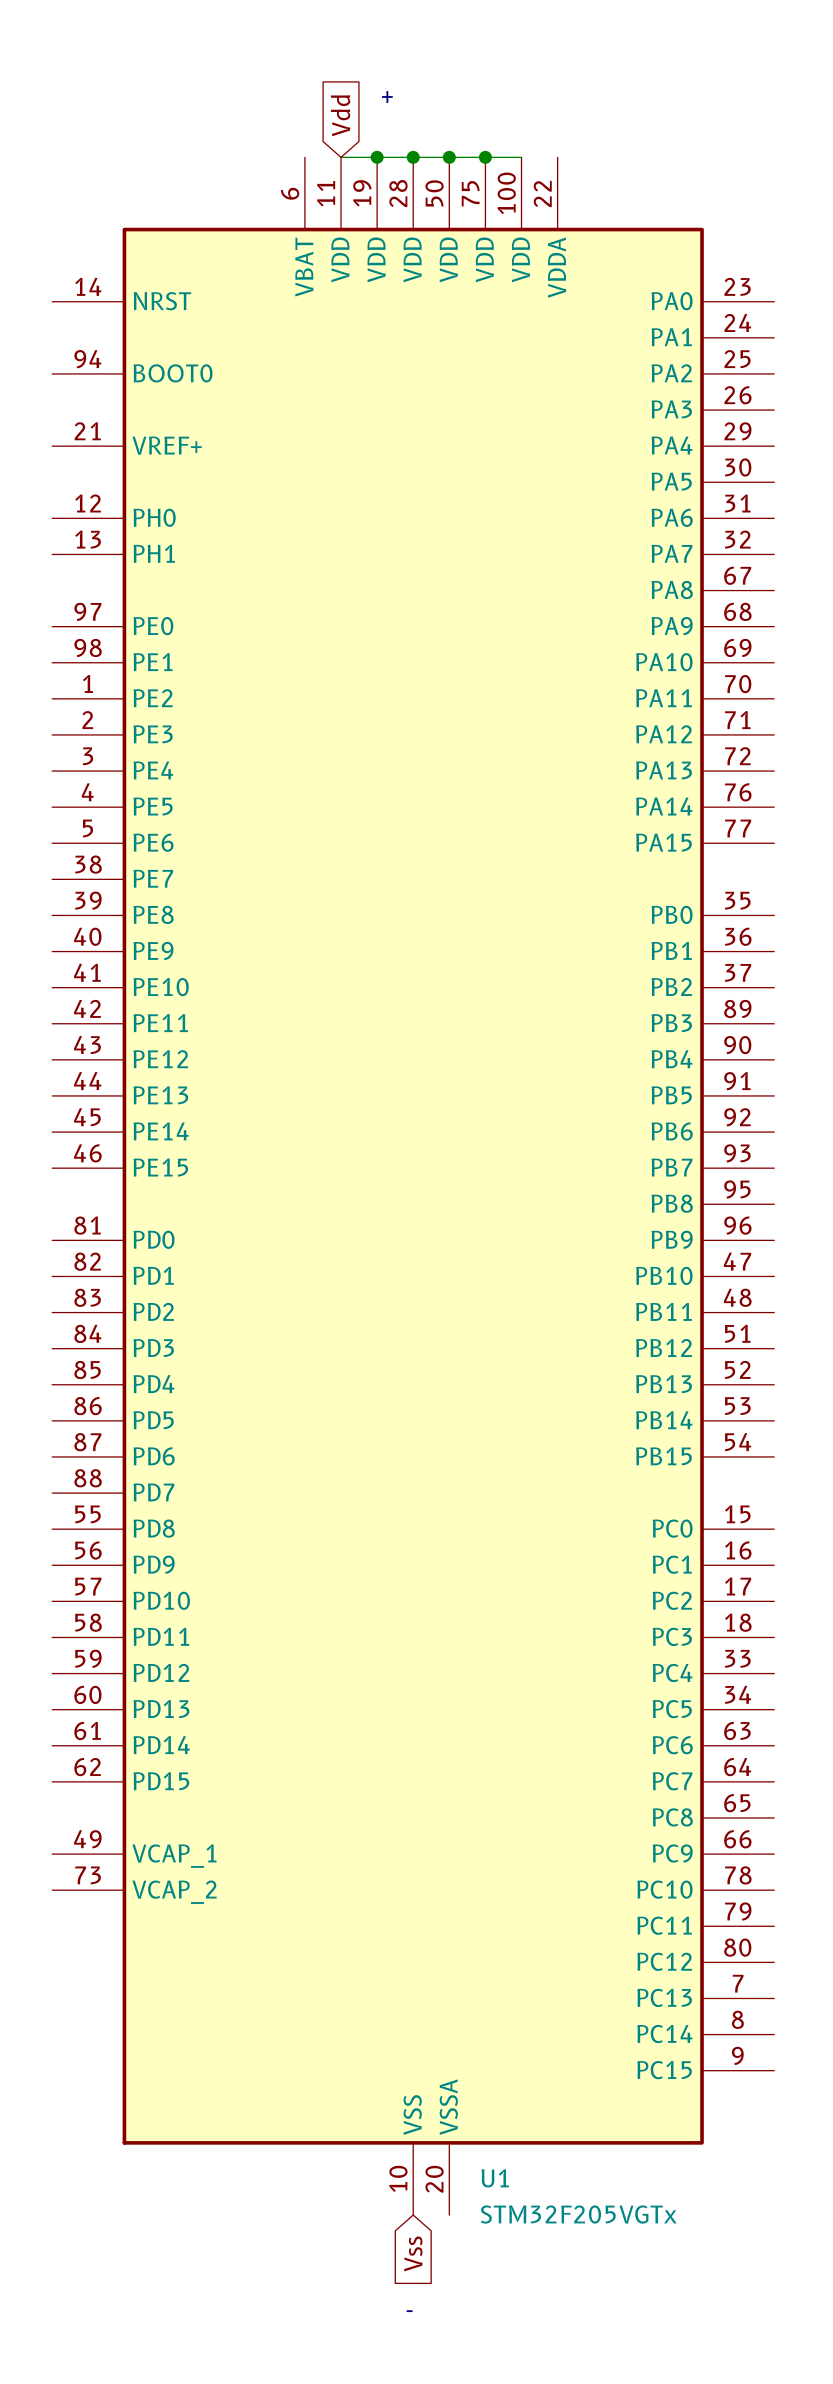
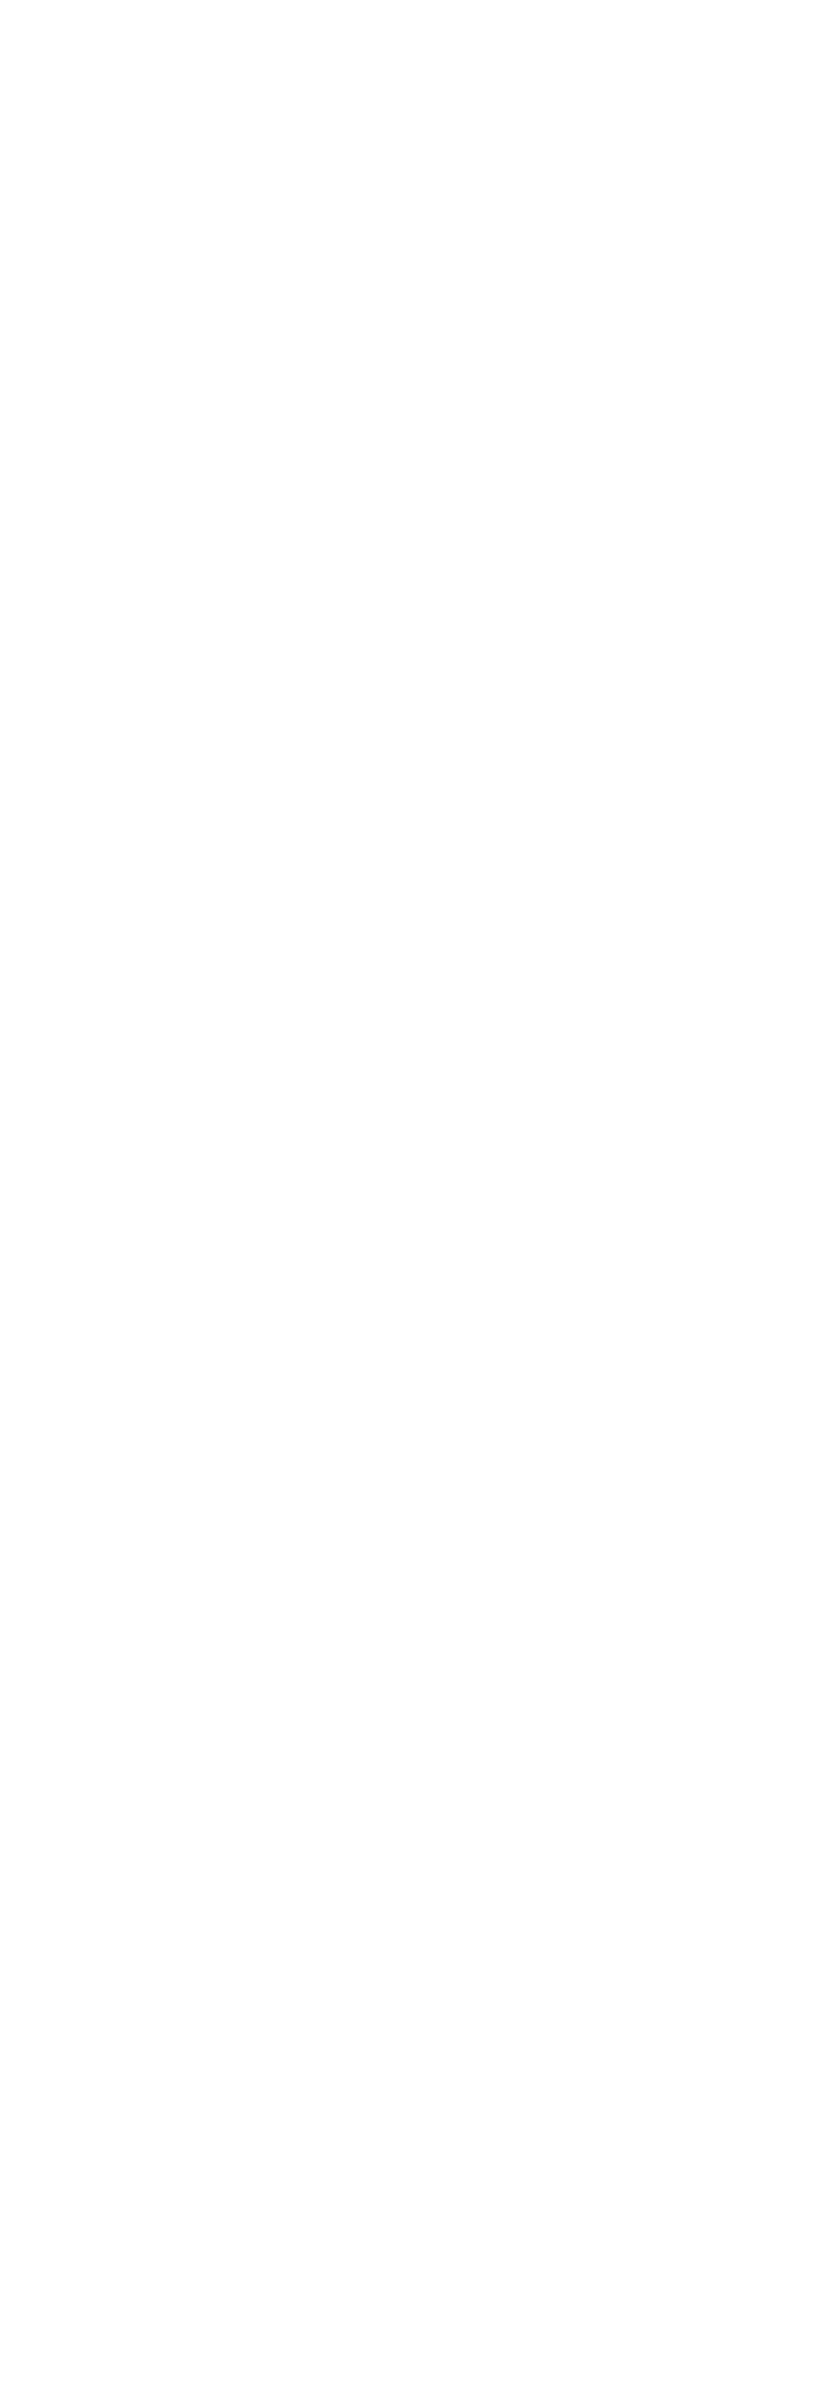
text: + (387, 97) -> none
global label: Vdd (340, 115) -> none
wire: (341, 157) (521, 157) -> none
junction: (377, 157) -> none
junction: (413, 157) -> none
junction: (449, 157) -> none
junction: (485, 157) -> none
U1: STM32F205VGTx (413, 1186) -> none
global label: Vss (413, 2253) -> none
text: - (409, 2311) -> none

